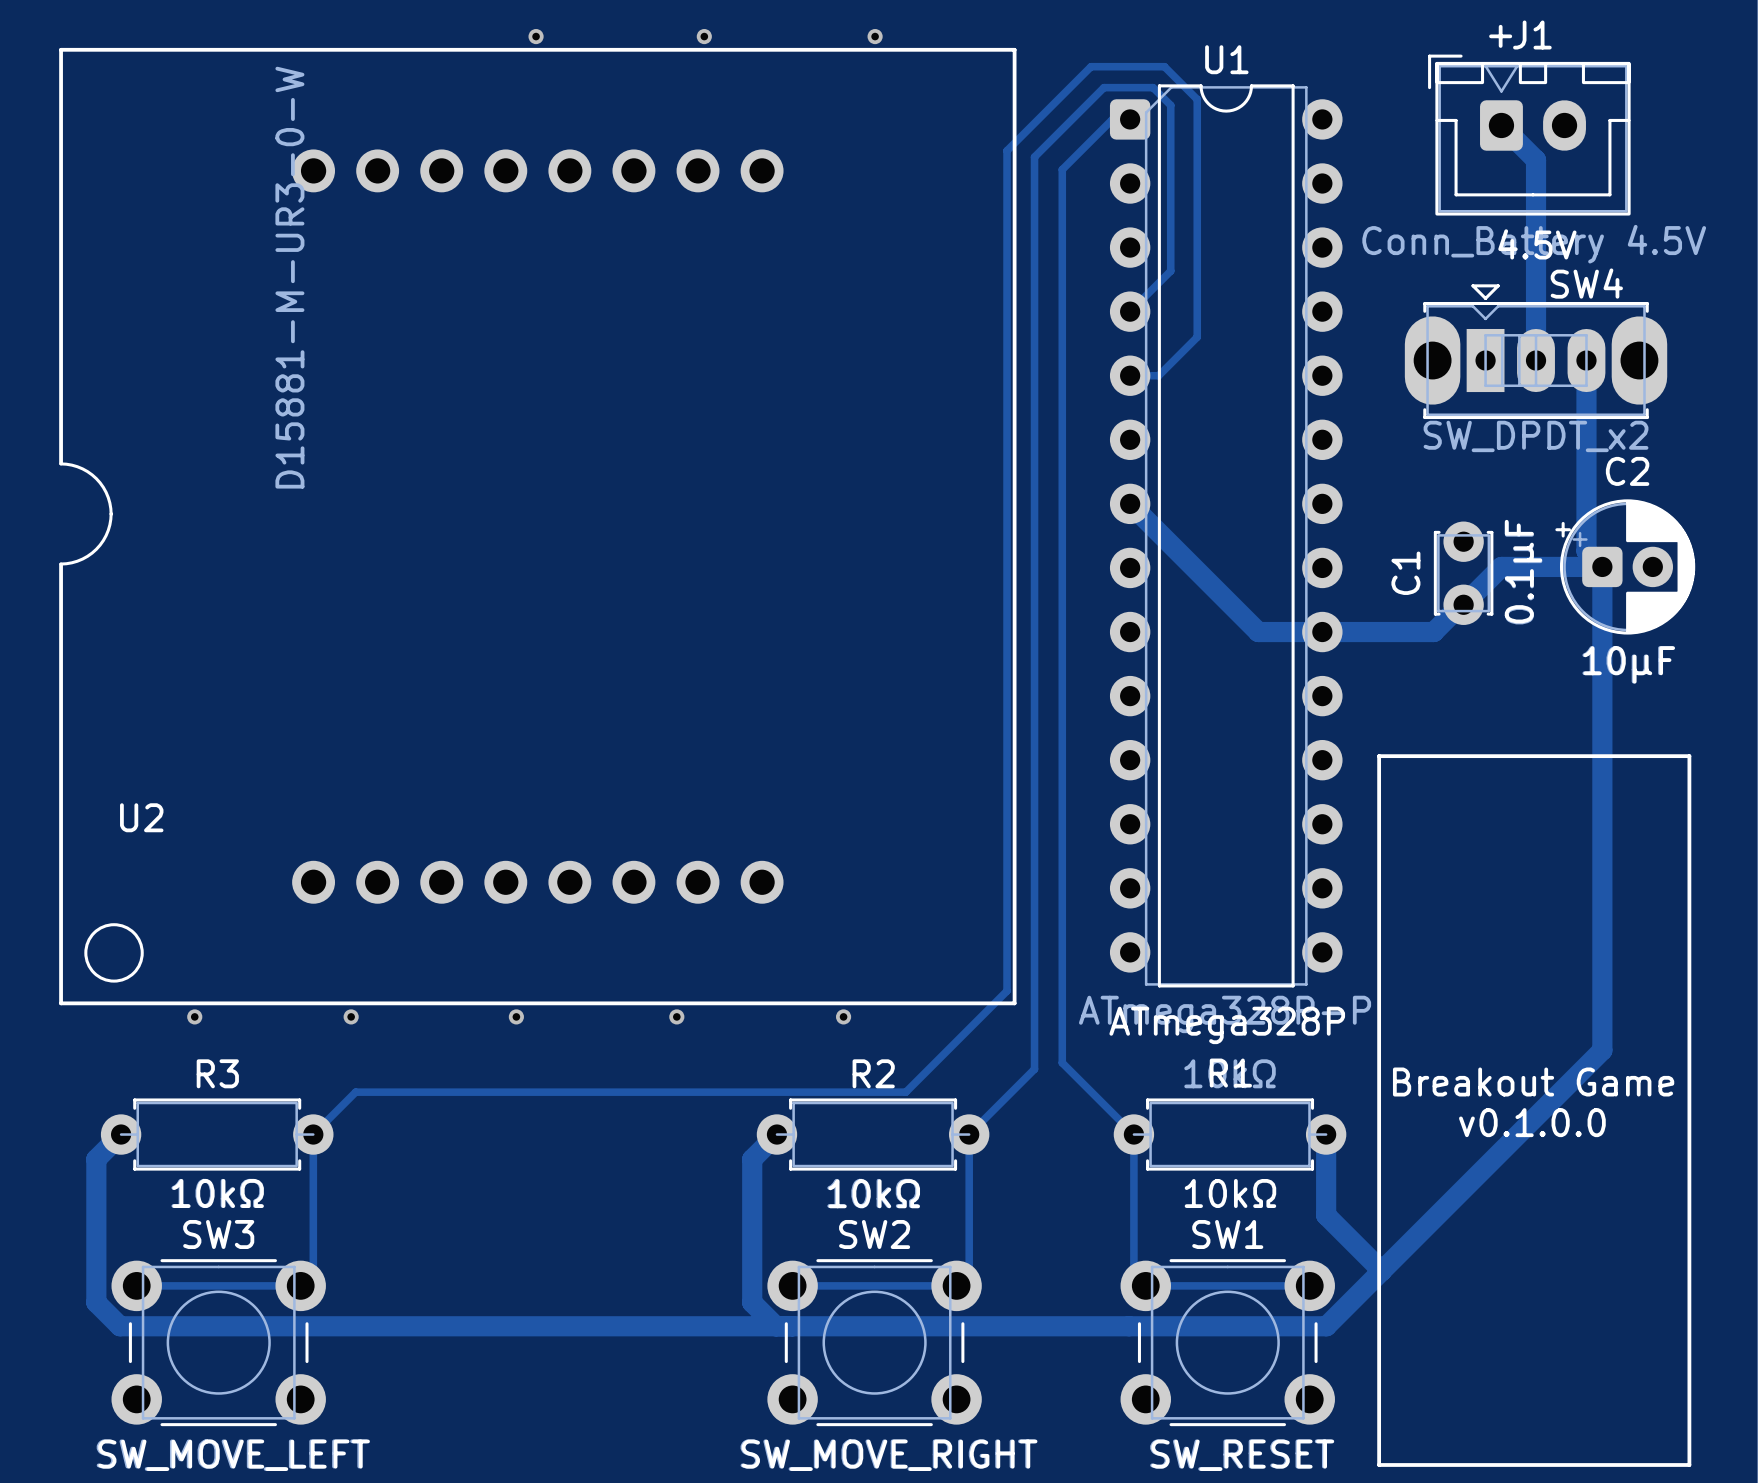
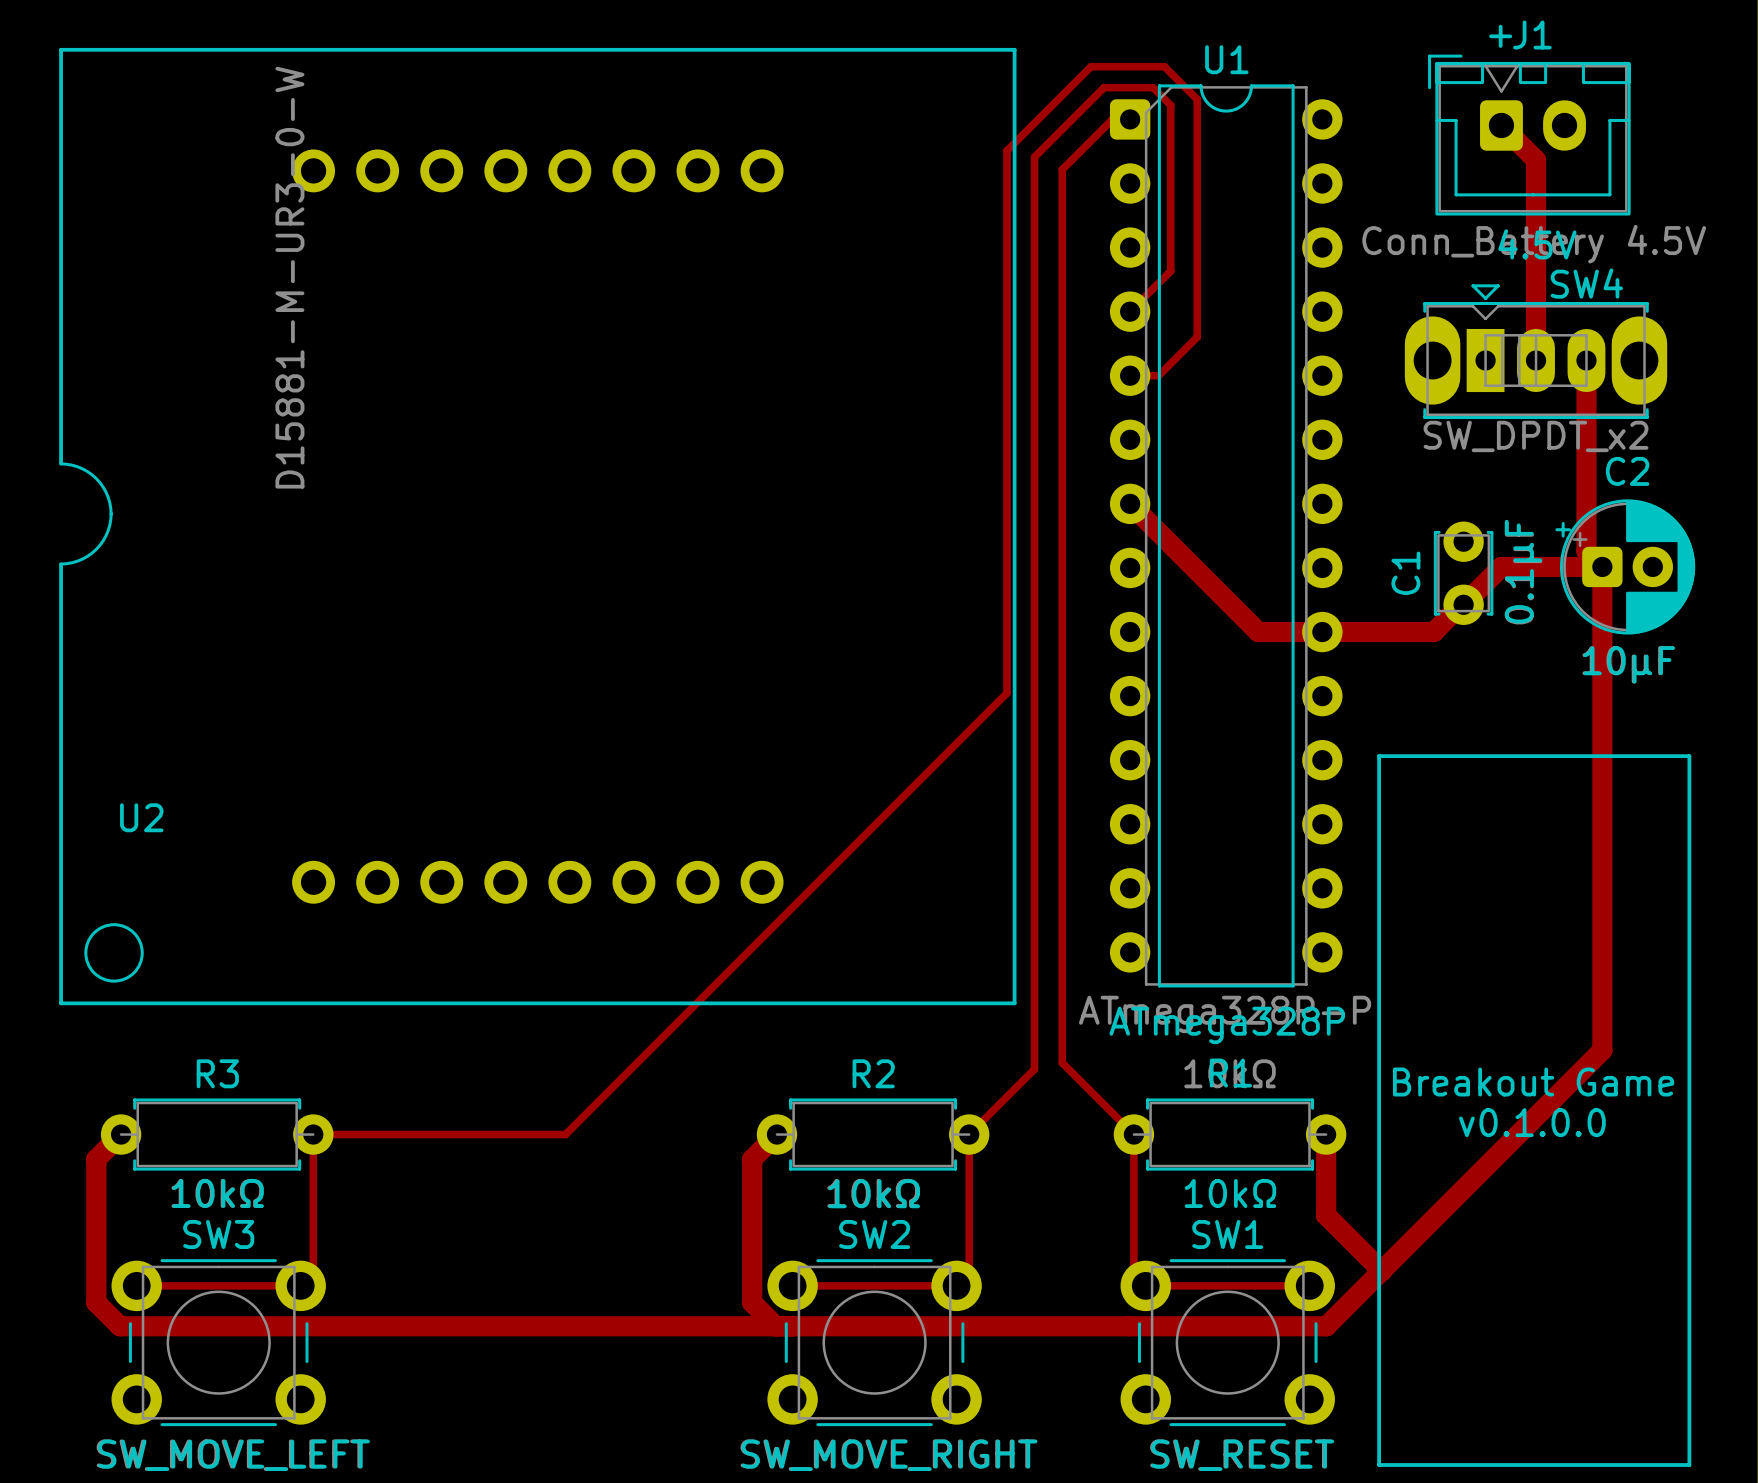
via: (536, 36) -> none
via: (704, 36) -> none
via: (875, 36) -> none
track: (1007, 693) (1007, 990) (905, 1092) (355, 1092) (313, 1134) -> (1007, 693) (565, 1134) (313, 1134)
via: (194, 1016) -> none
via: (351, 1016) -> none
via: (516, 1016) -> none
via: (676, 1016) -> none
via: (843, 1016) -> none

